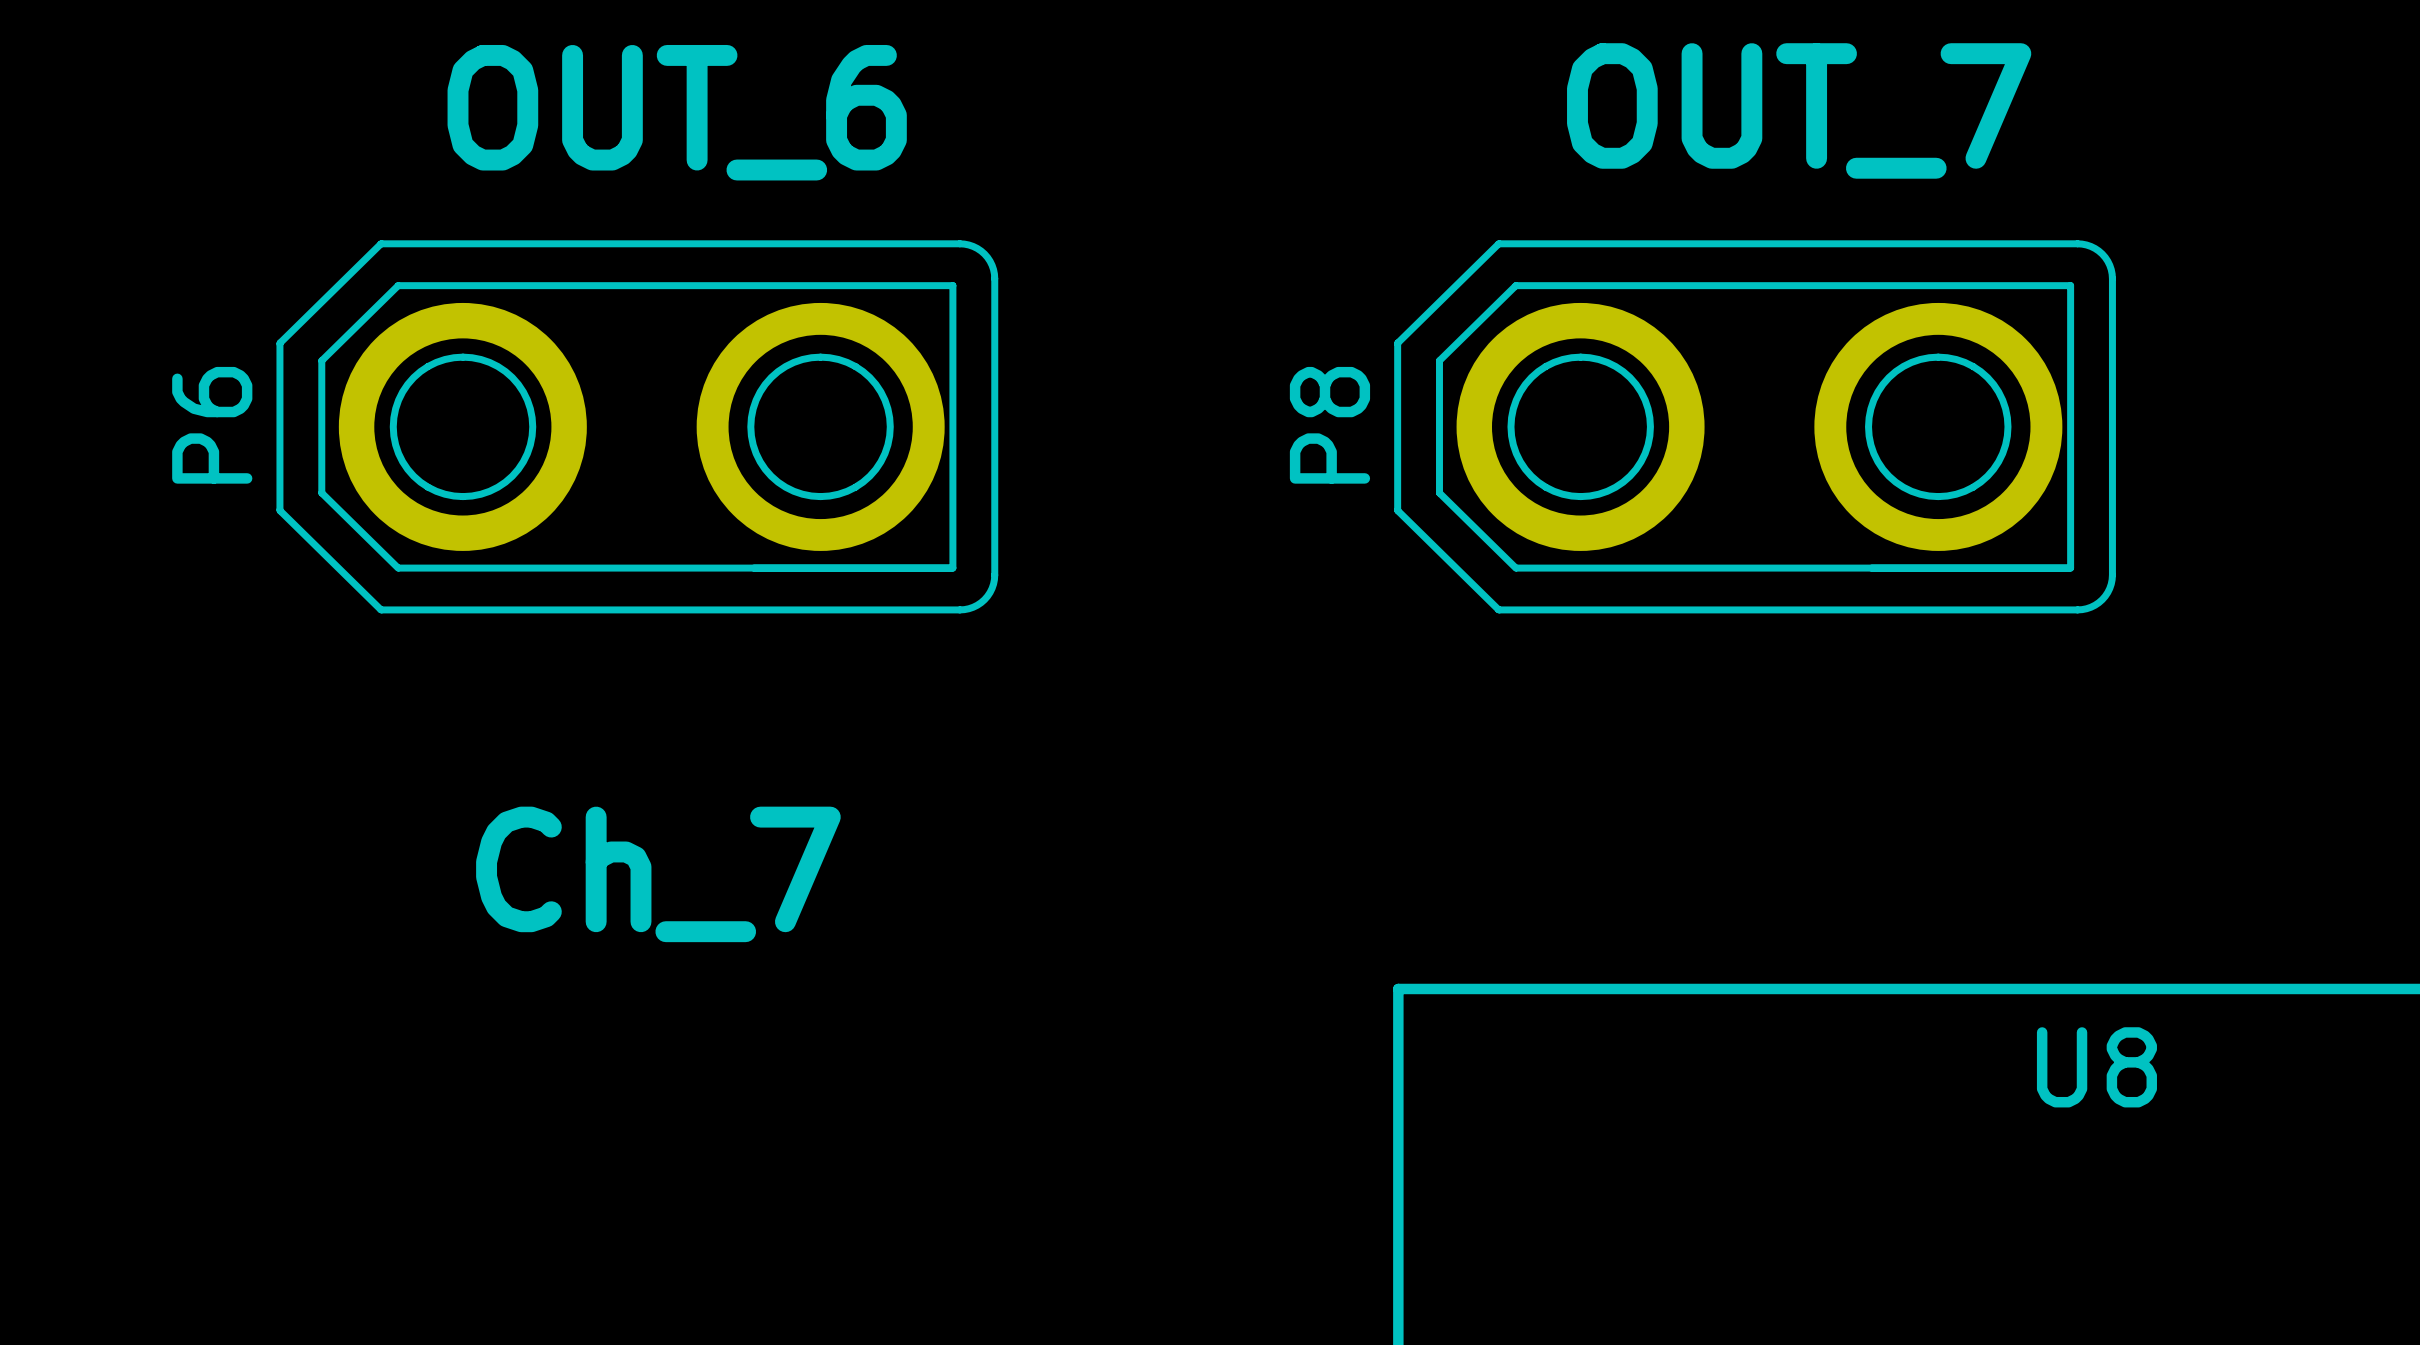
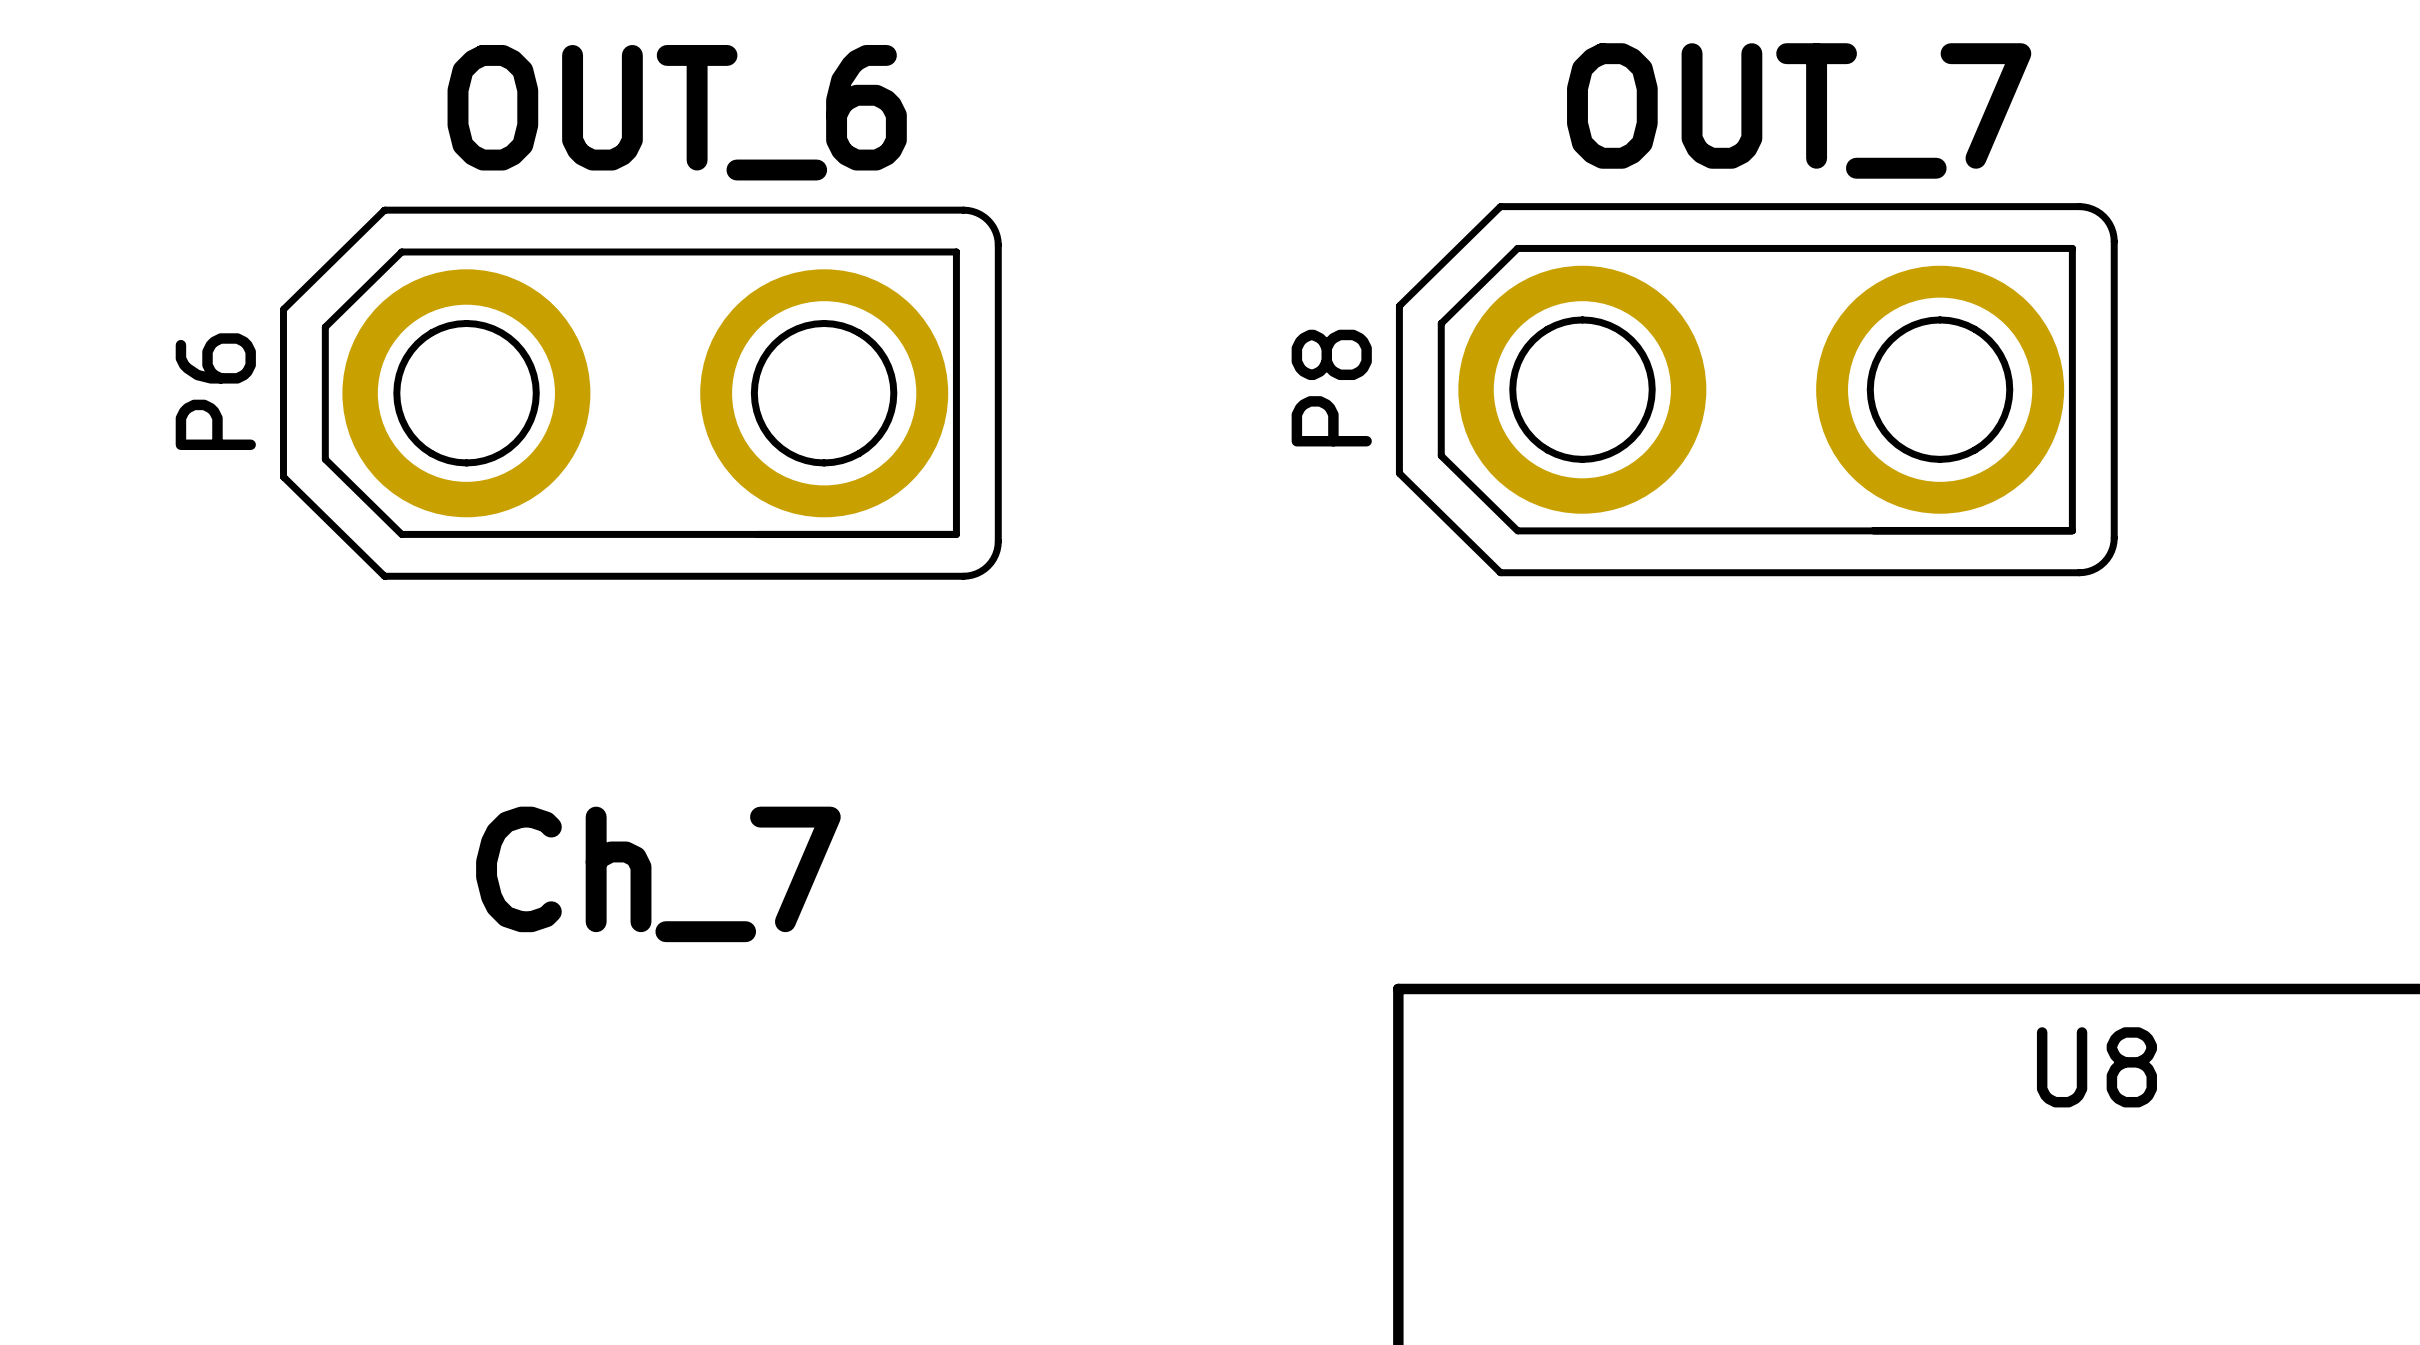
P6 footprint: [276, 240, 999, 614] -> [280, 206, 1002, 580]
P6 name position: P6 (212, 425) -> P6 (215, 391)
P8 position: (1755, 426) -> (1756, 389)

